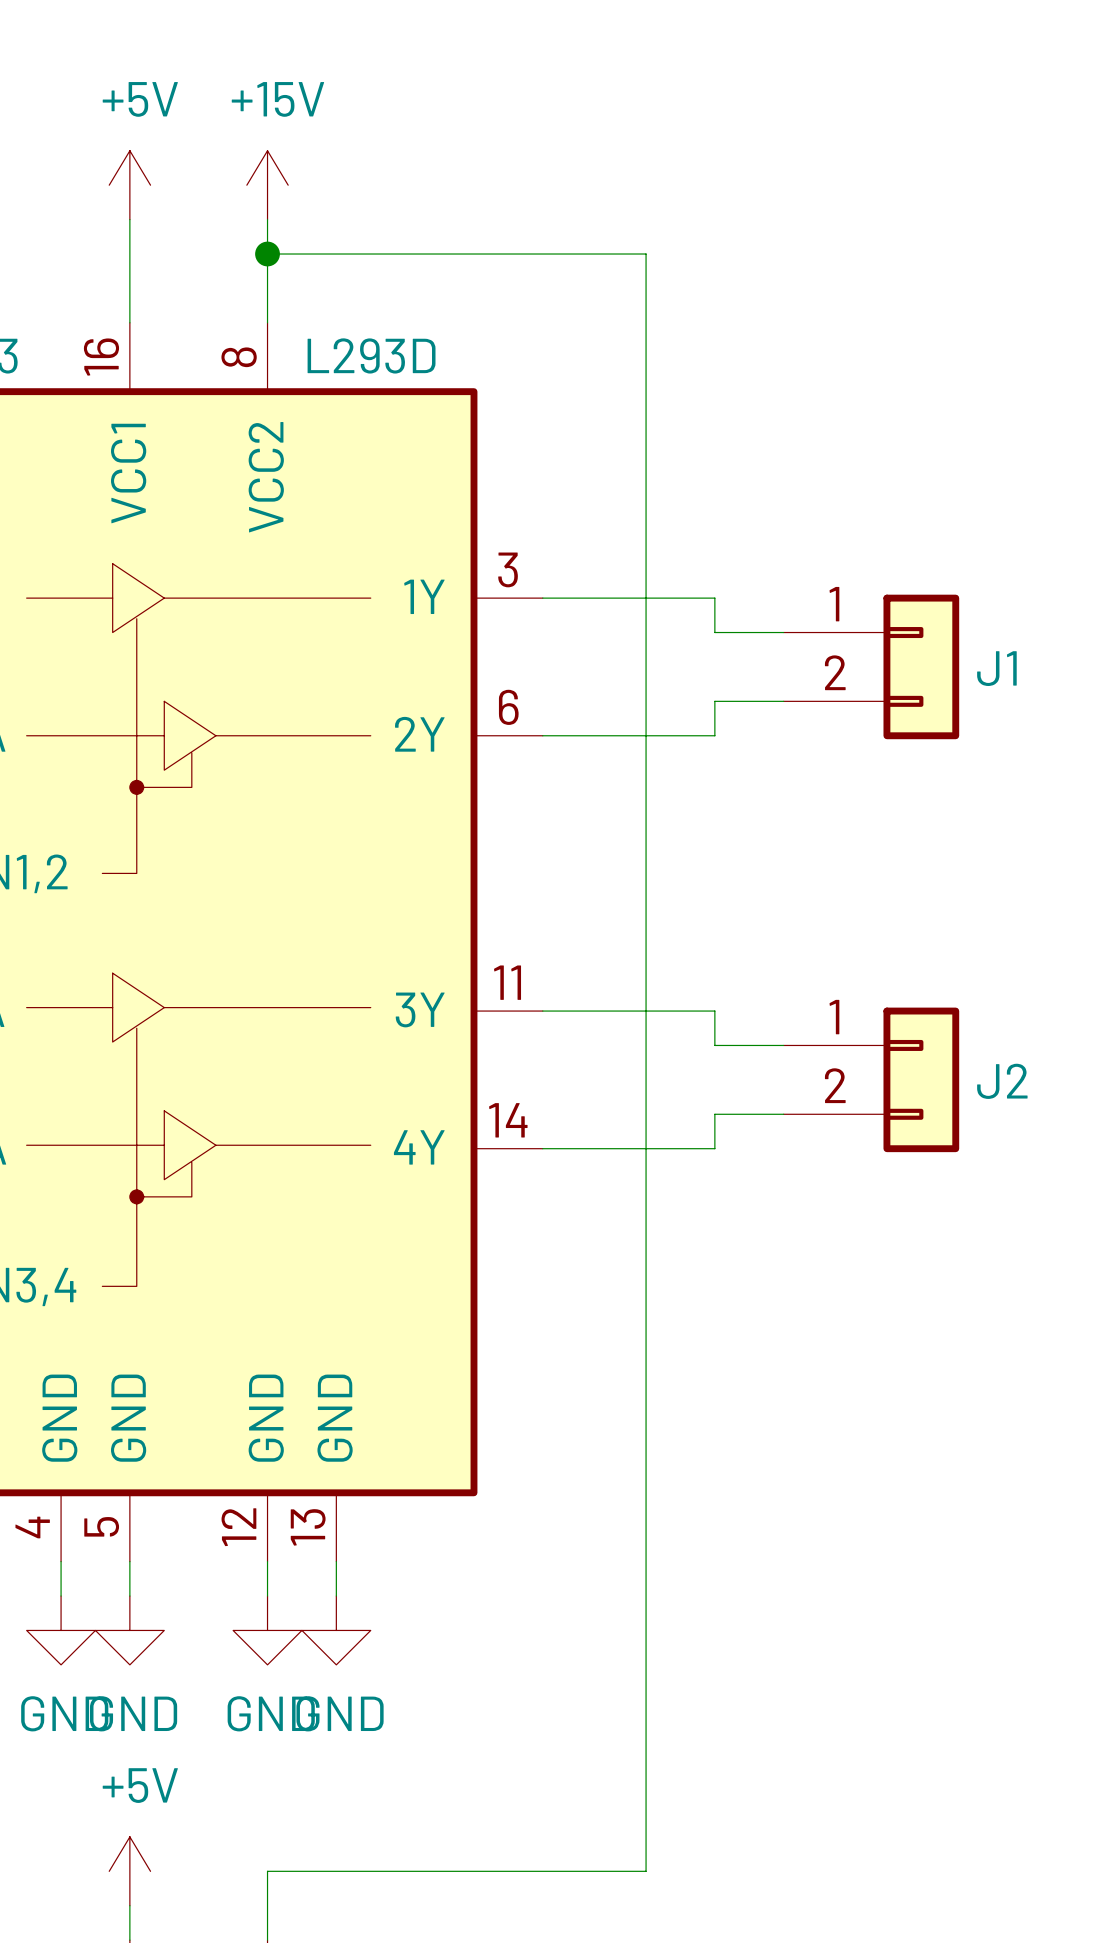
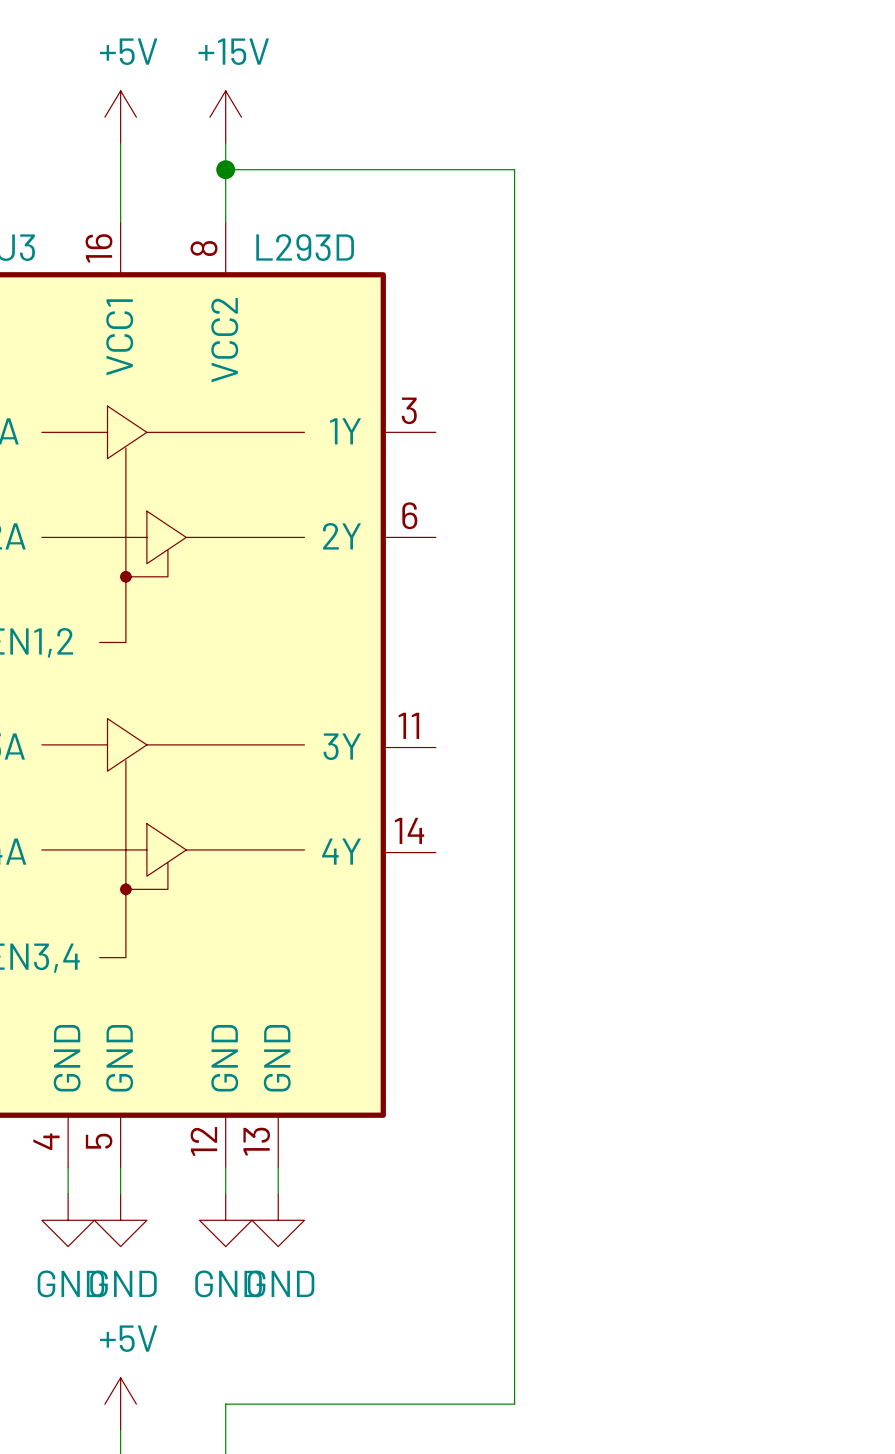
wire: (542, 598) (714, 598) (714, 632) (783, 632) -> none
J1: (871, 666) -> none
wire: (783, 701) (714, 701) (714, 735) (542, 735) -> none
wire: (542, 1011) (714, 1011) (714, 1045) (783, 1045) -> none
J2: (871, 1079) -> none
wire: (783, 1114) (714, 1114) (714, 1148) (542, 1148) -> none

